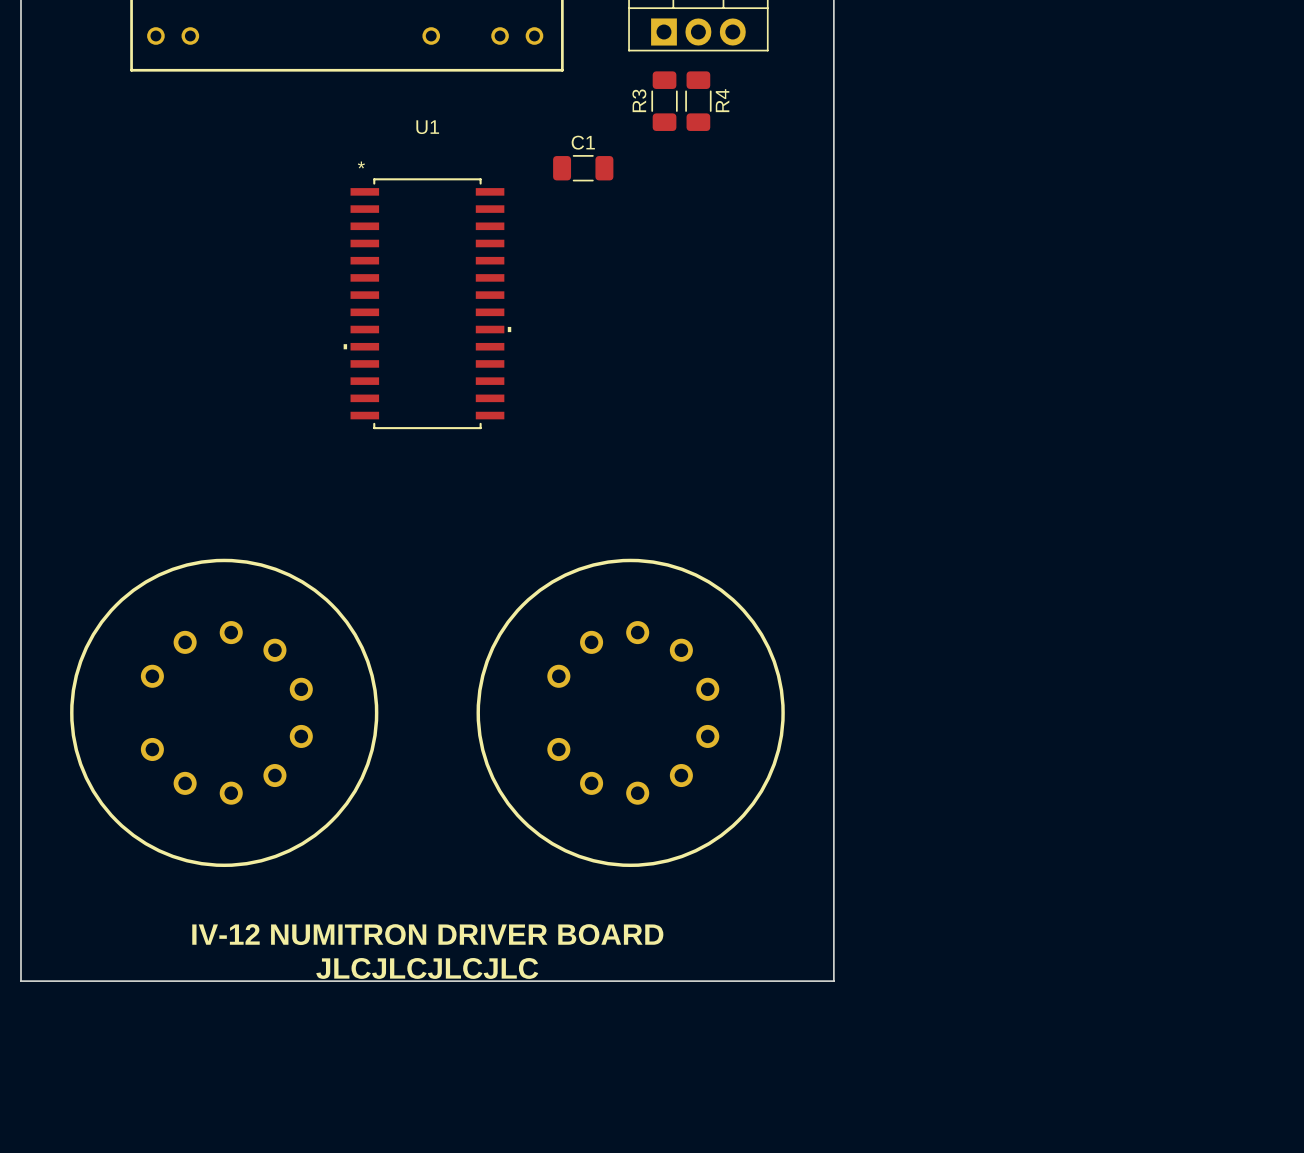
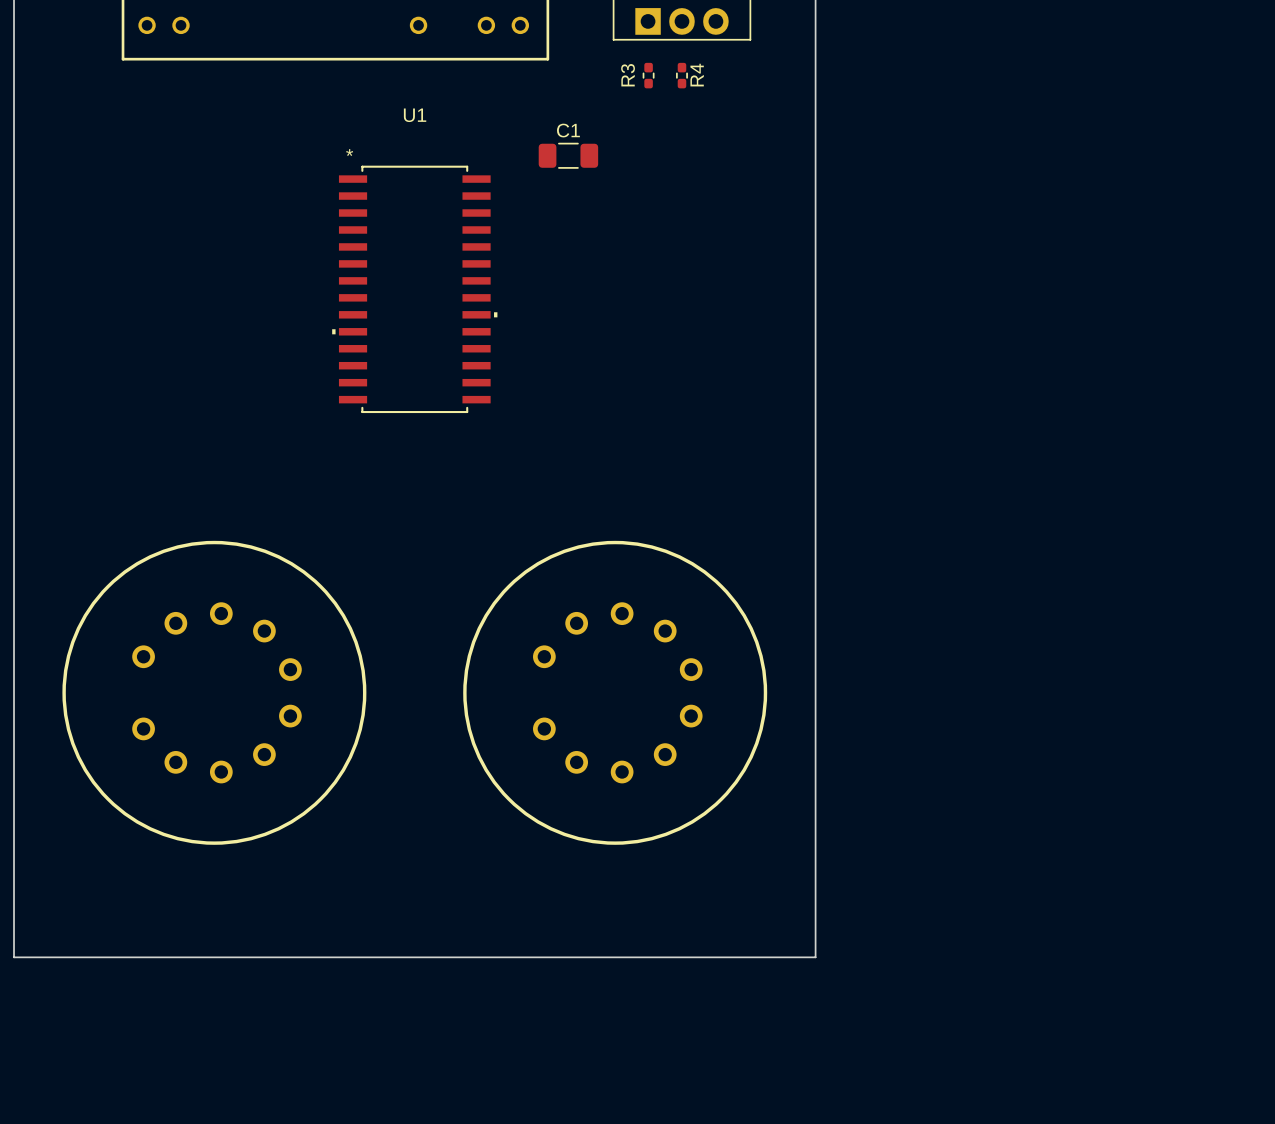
R3 footprint: [651, 71, 678, 131] -> [642, 62, 655, 89]
R4 footprint: [685, 71, 712, 131] -> [676, 62, 688, 89]
text: IV-12 NUMITRON DRIVER BOARD (427, 934) -> none
text: JLCJLCJLCJLC (427, 968) -> none

